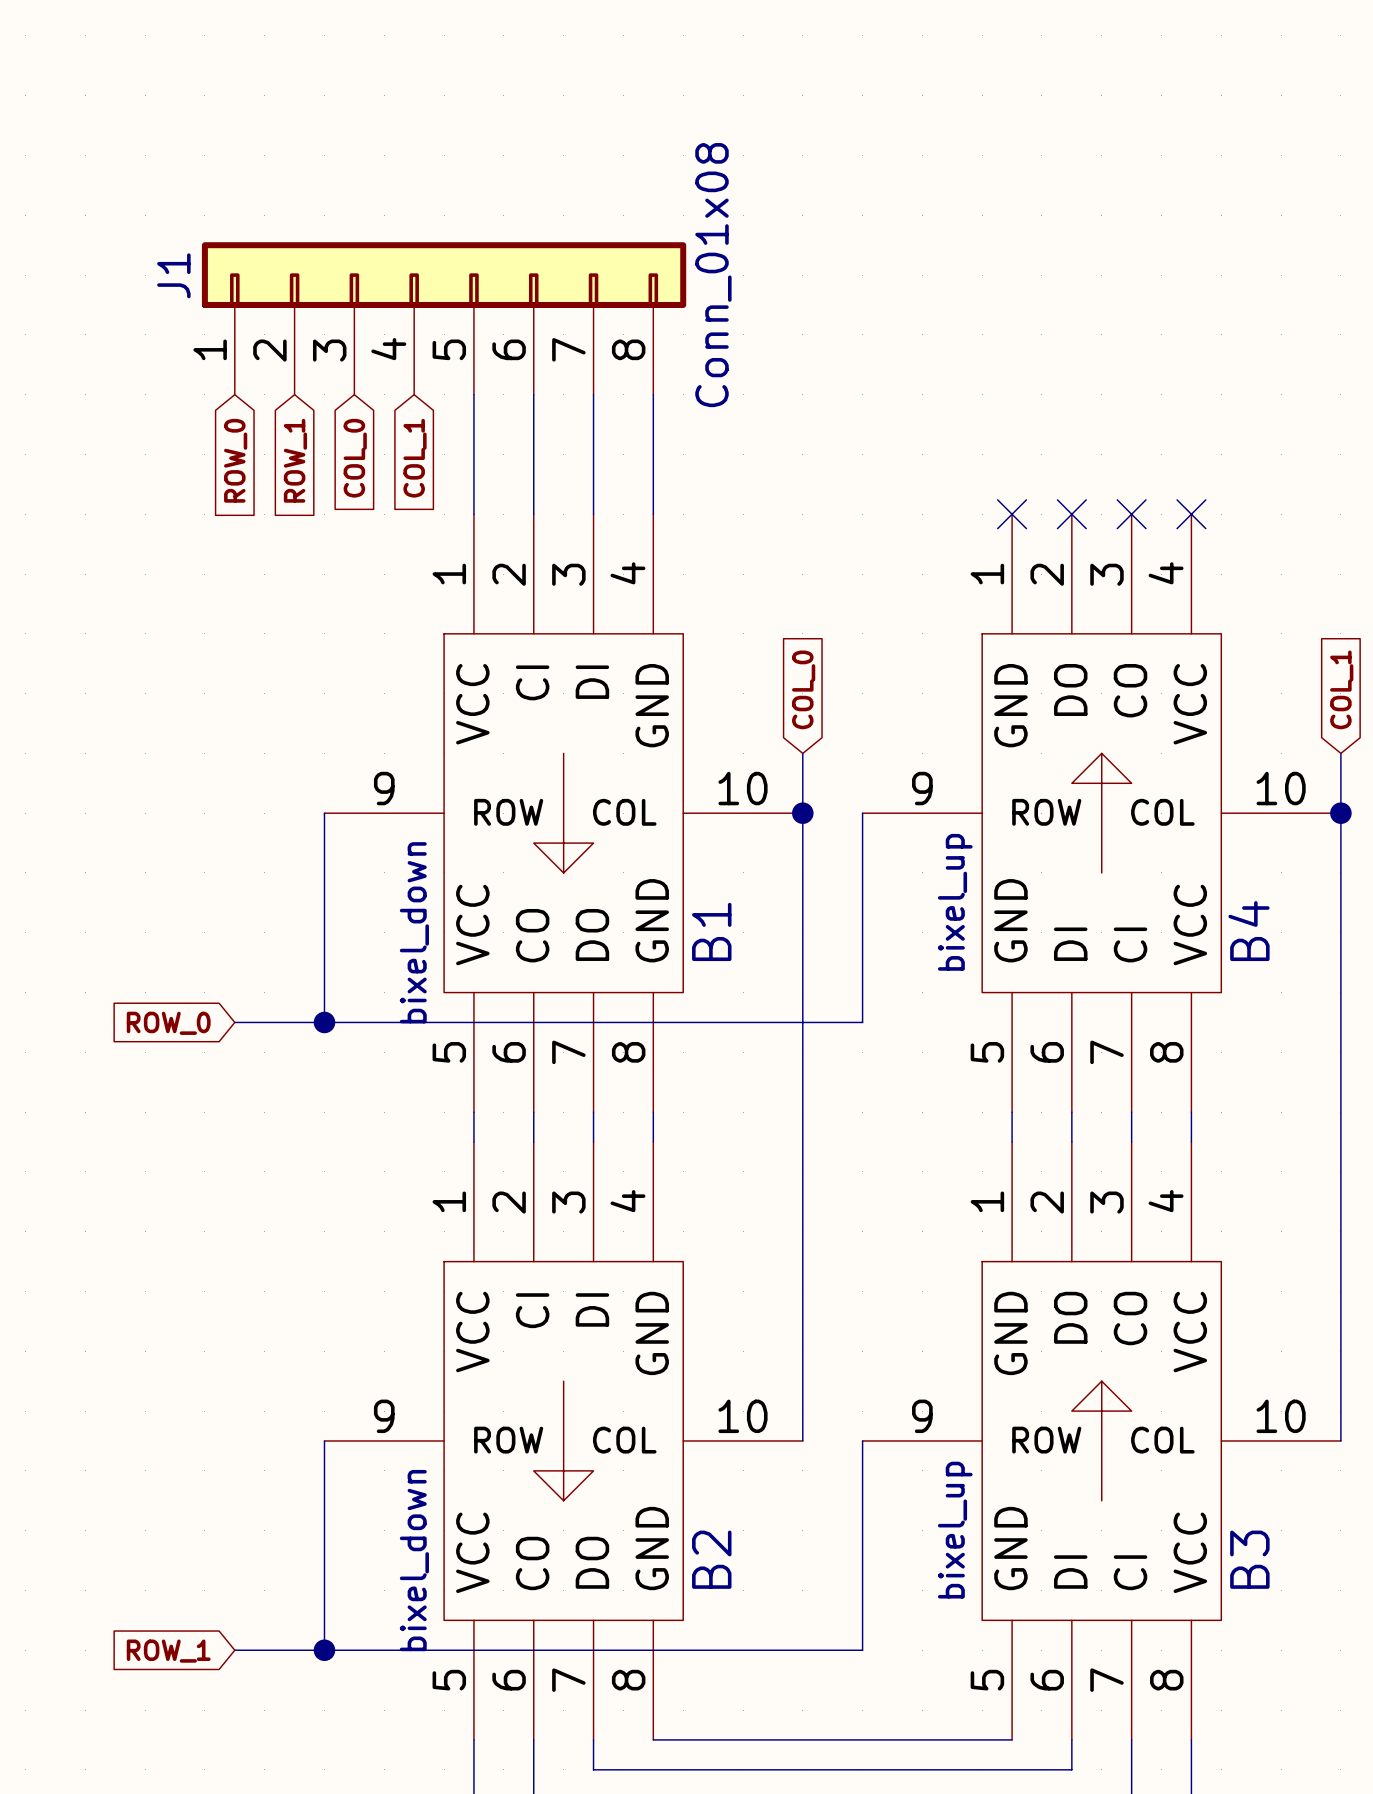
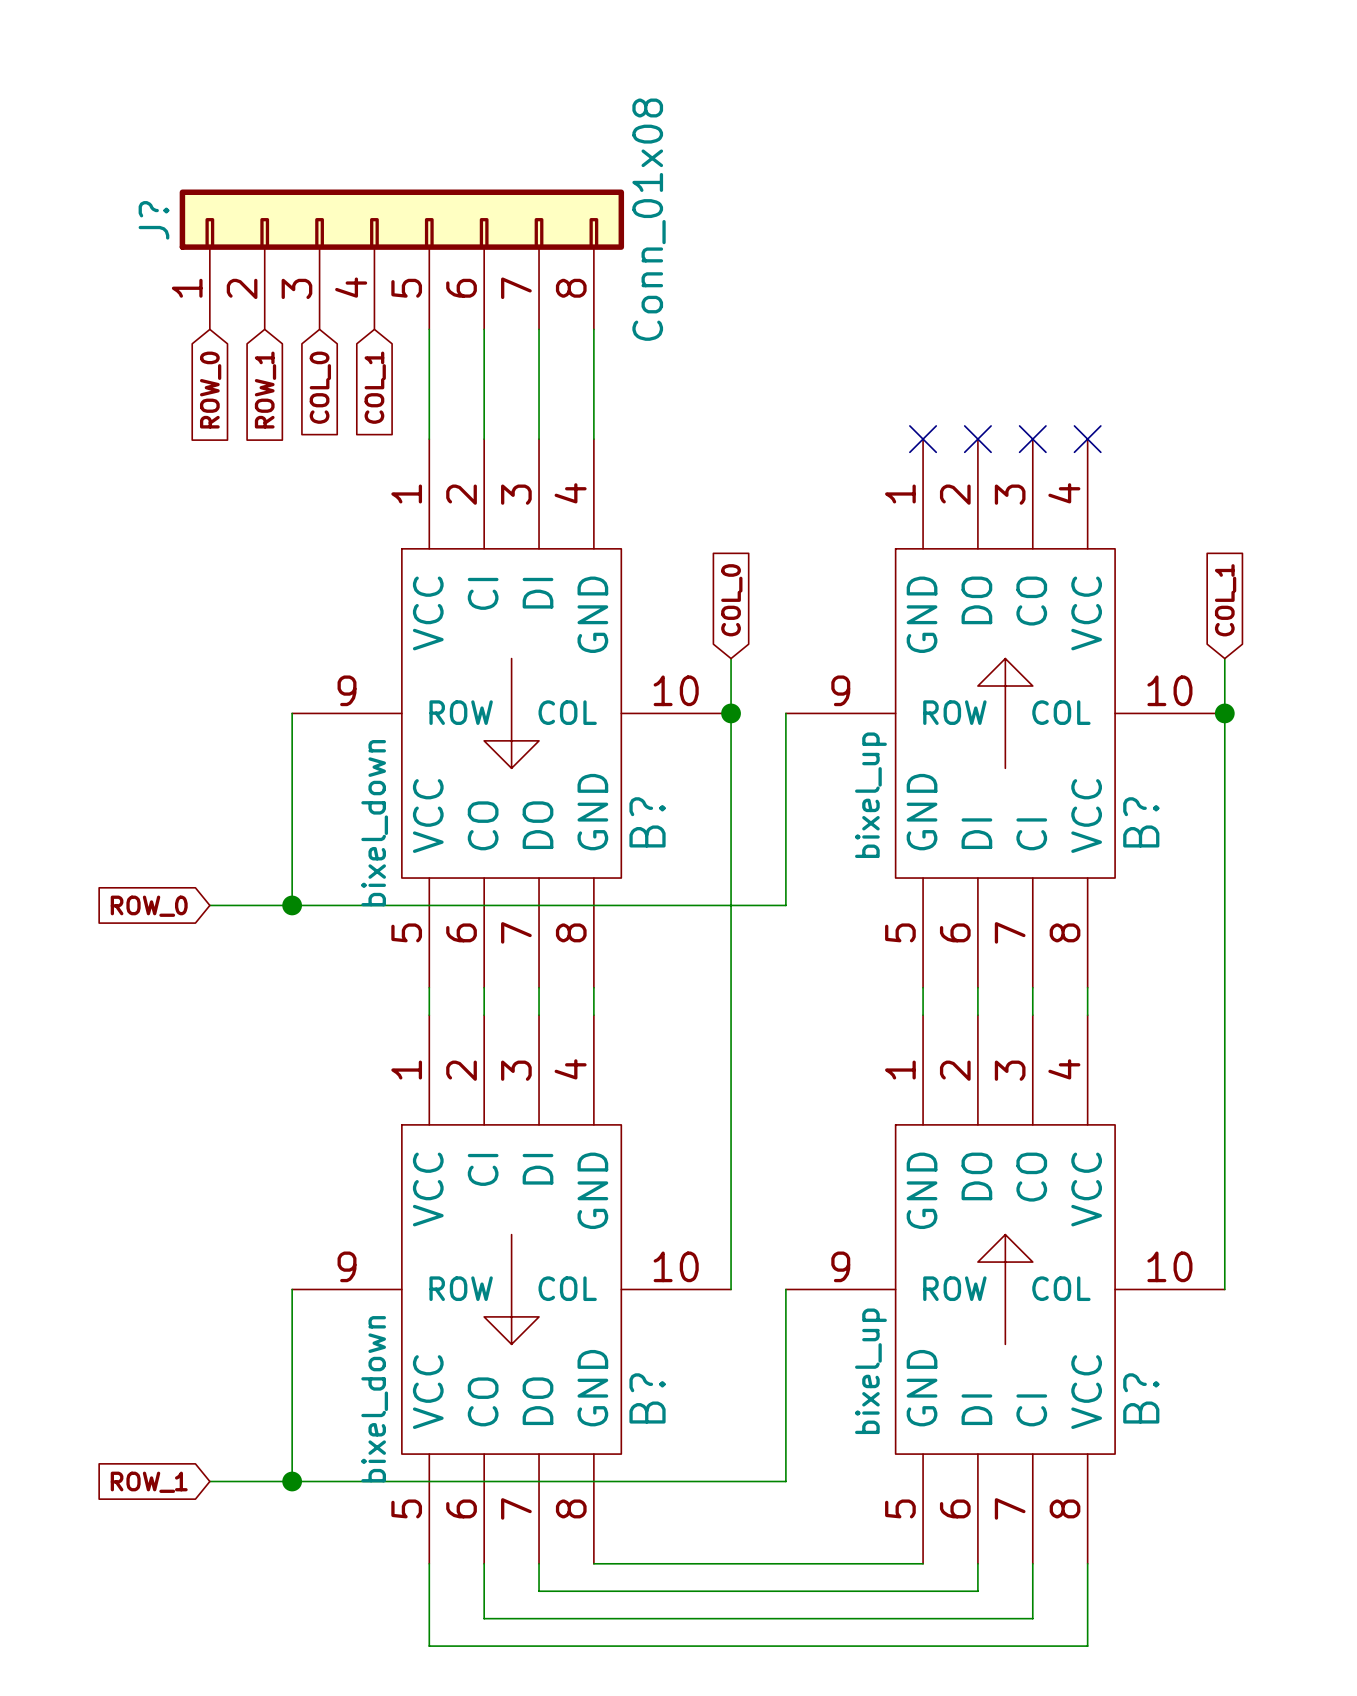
J1 name: J1 (173, 275) -> J? (153, 220)
B1 name: B1 (711, 931) -> B? (647, 822)
B4 name: B4 (1249, 931) -> B? (1141, 822)
B2 name: B2 (711, 1559) -> B? (647, 1398)
B3 name: B3 (1249, 1559) -> B? (1141, 1398)

